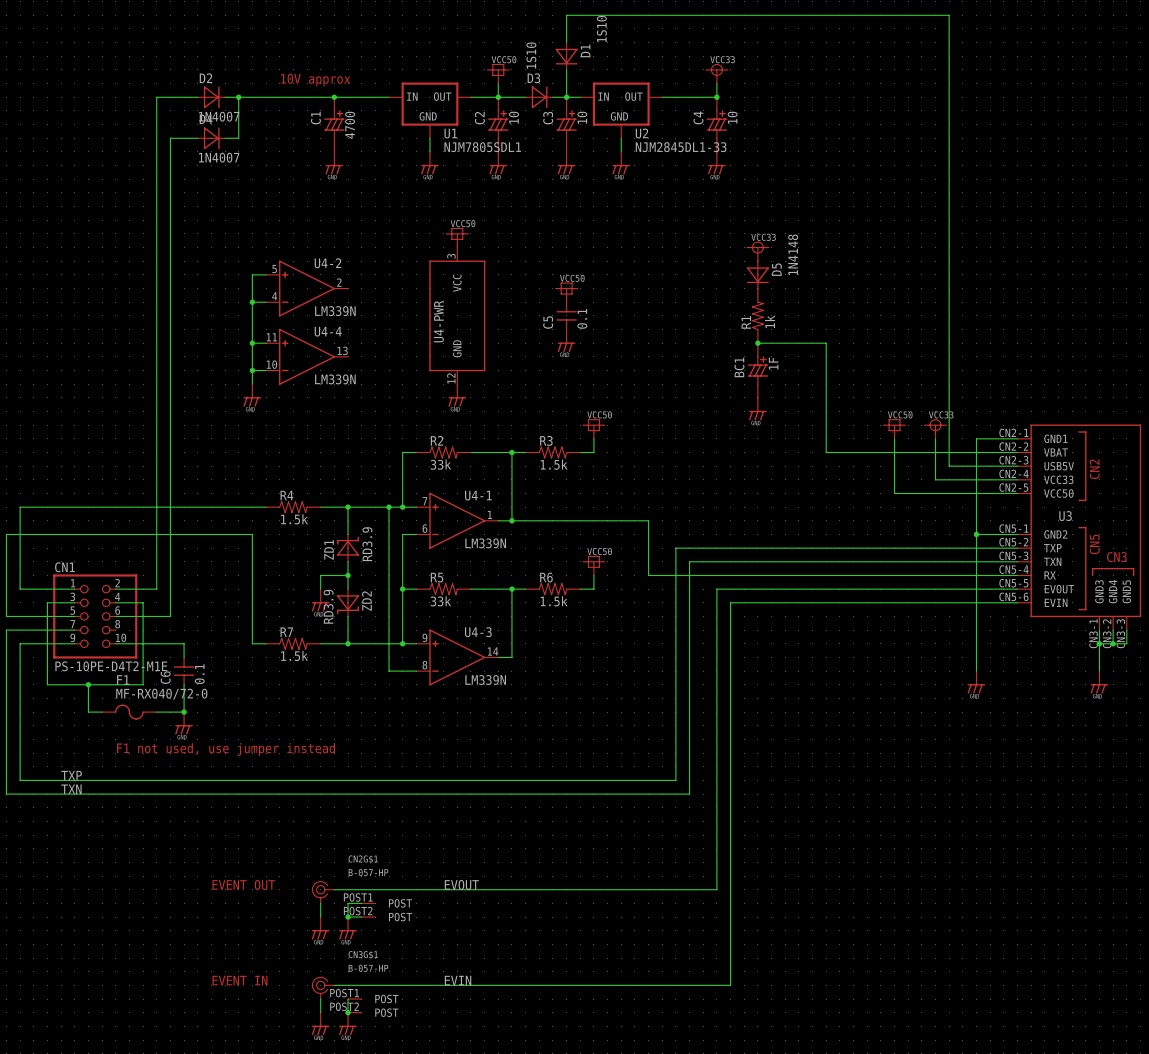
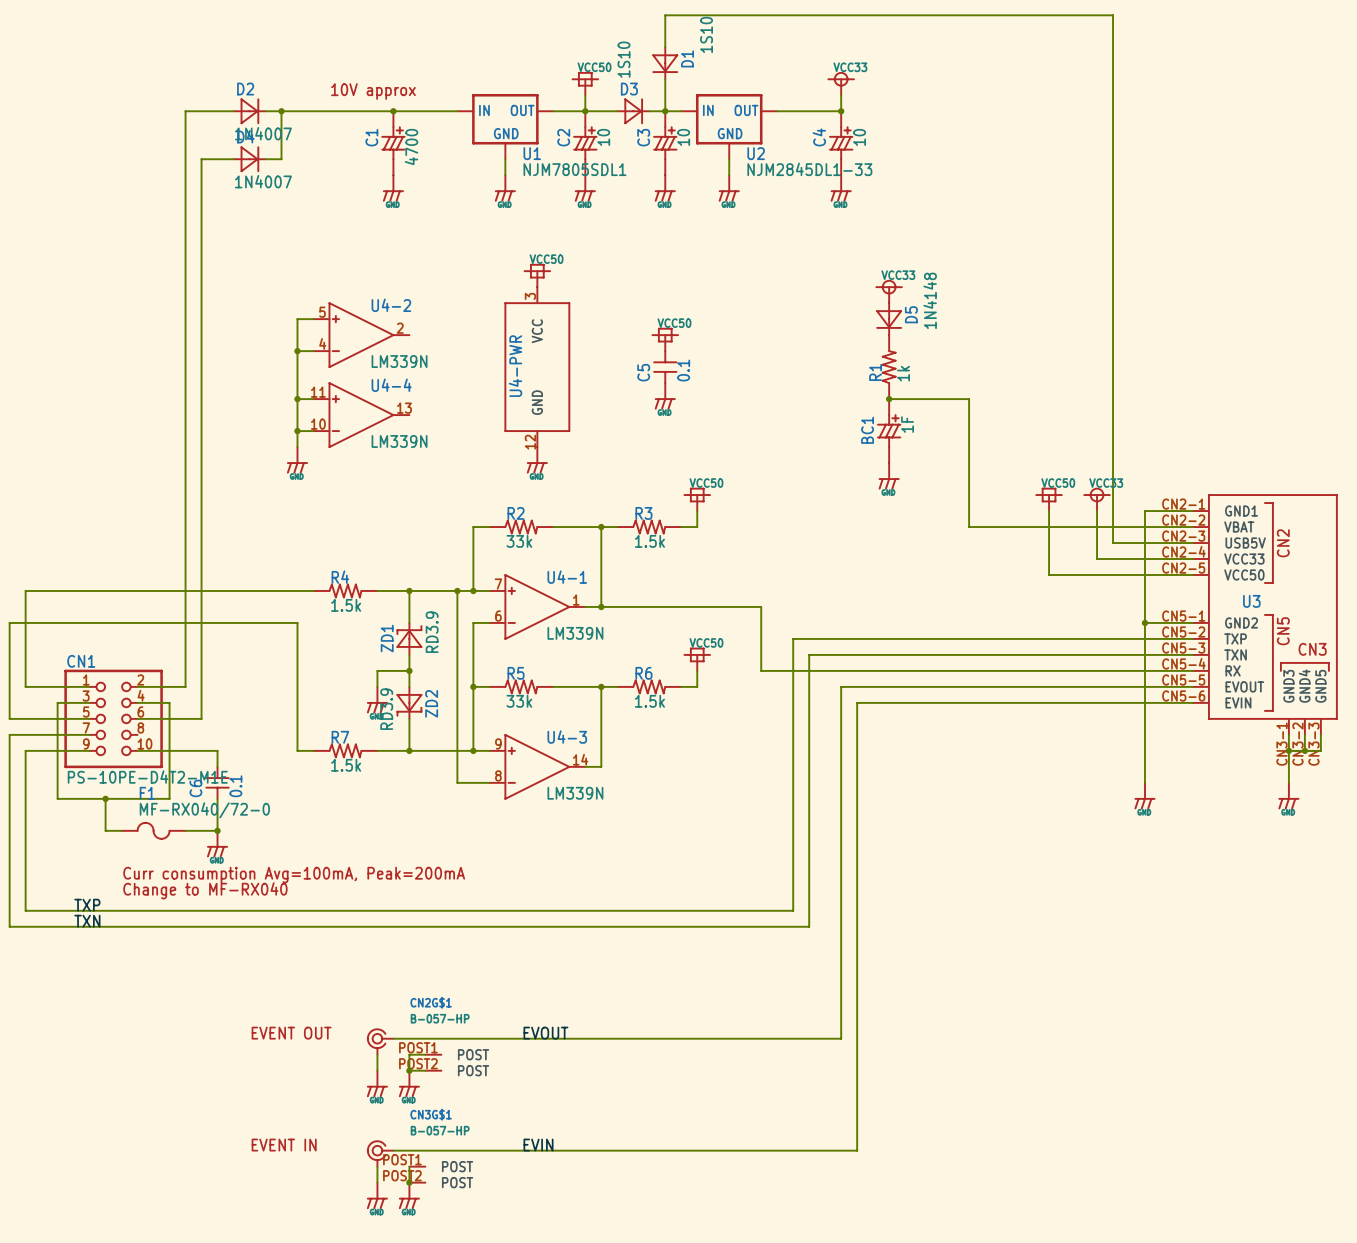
text: F1 not used, use jumper instead (226, 749) -> none
text: none -> Curr consumption Avg=100mA, Peak=200mA (294, 875)
text: none -> Change to MF-RX040 (205, 890)

